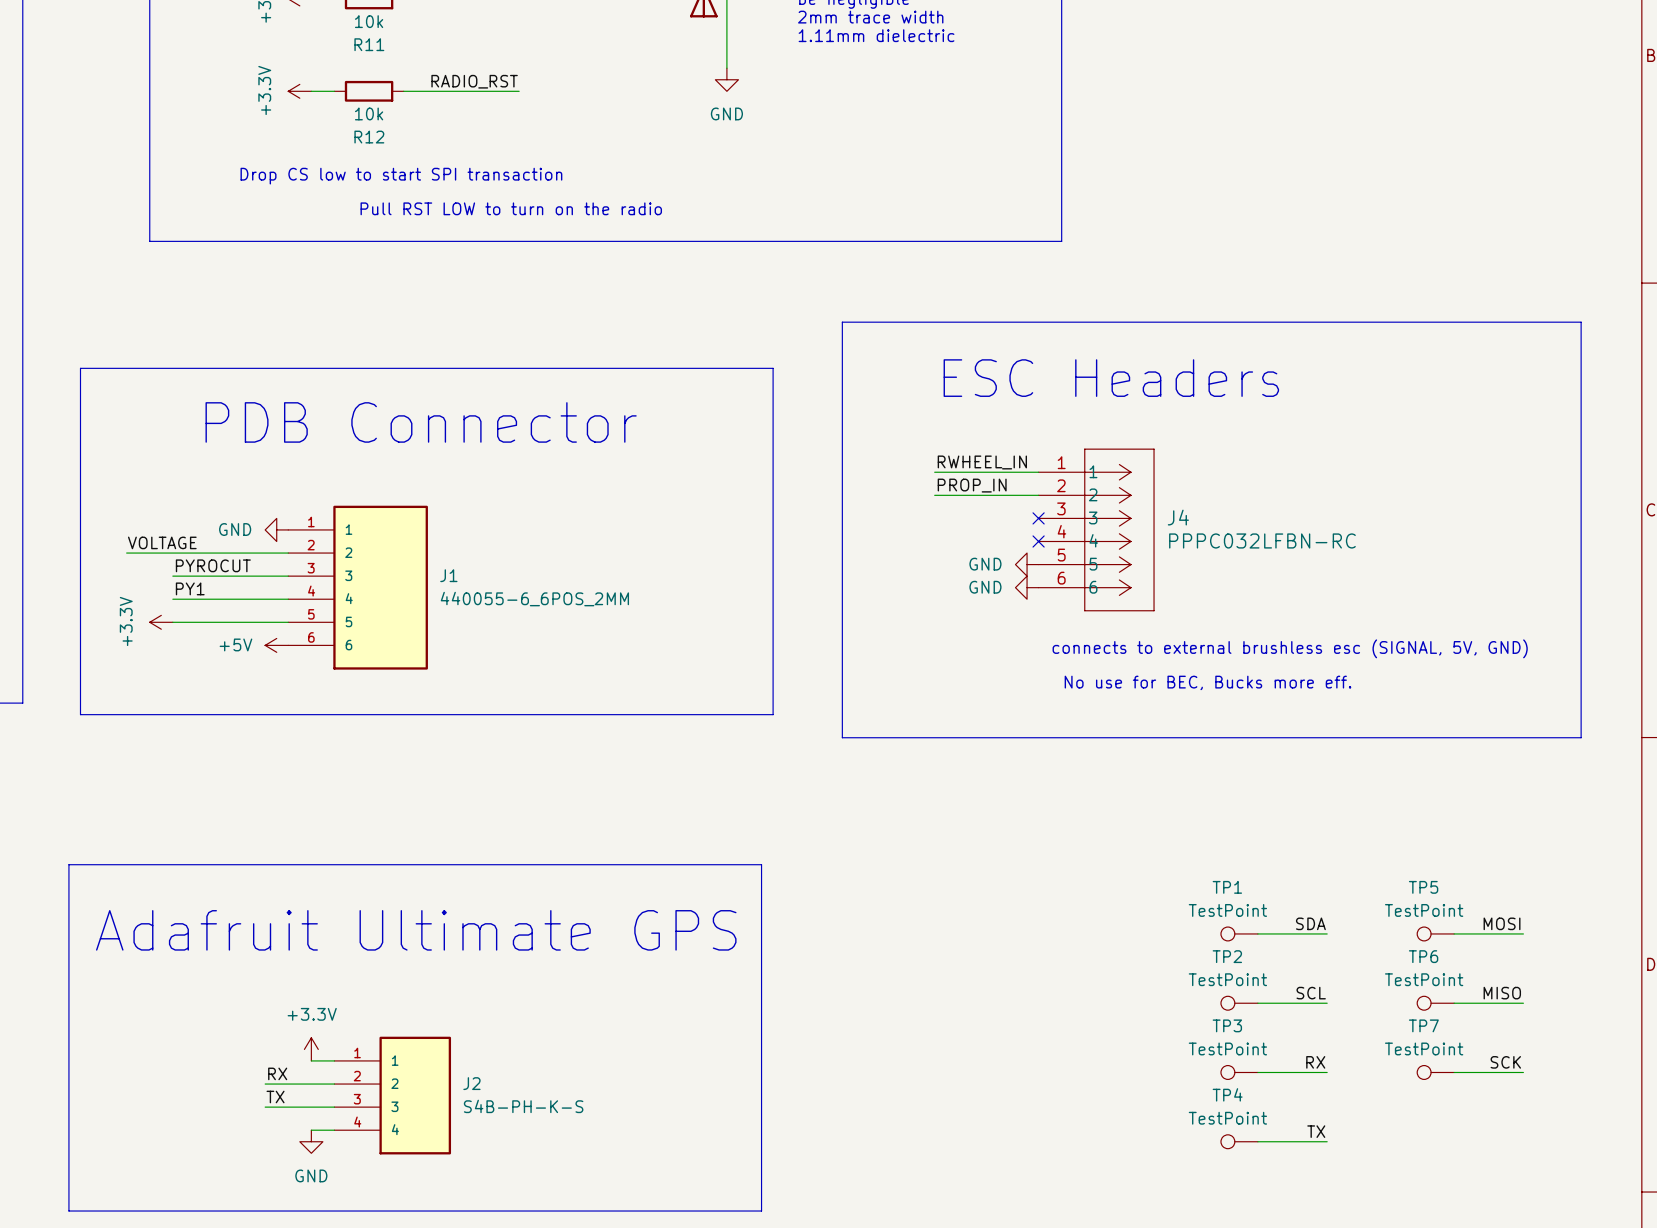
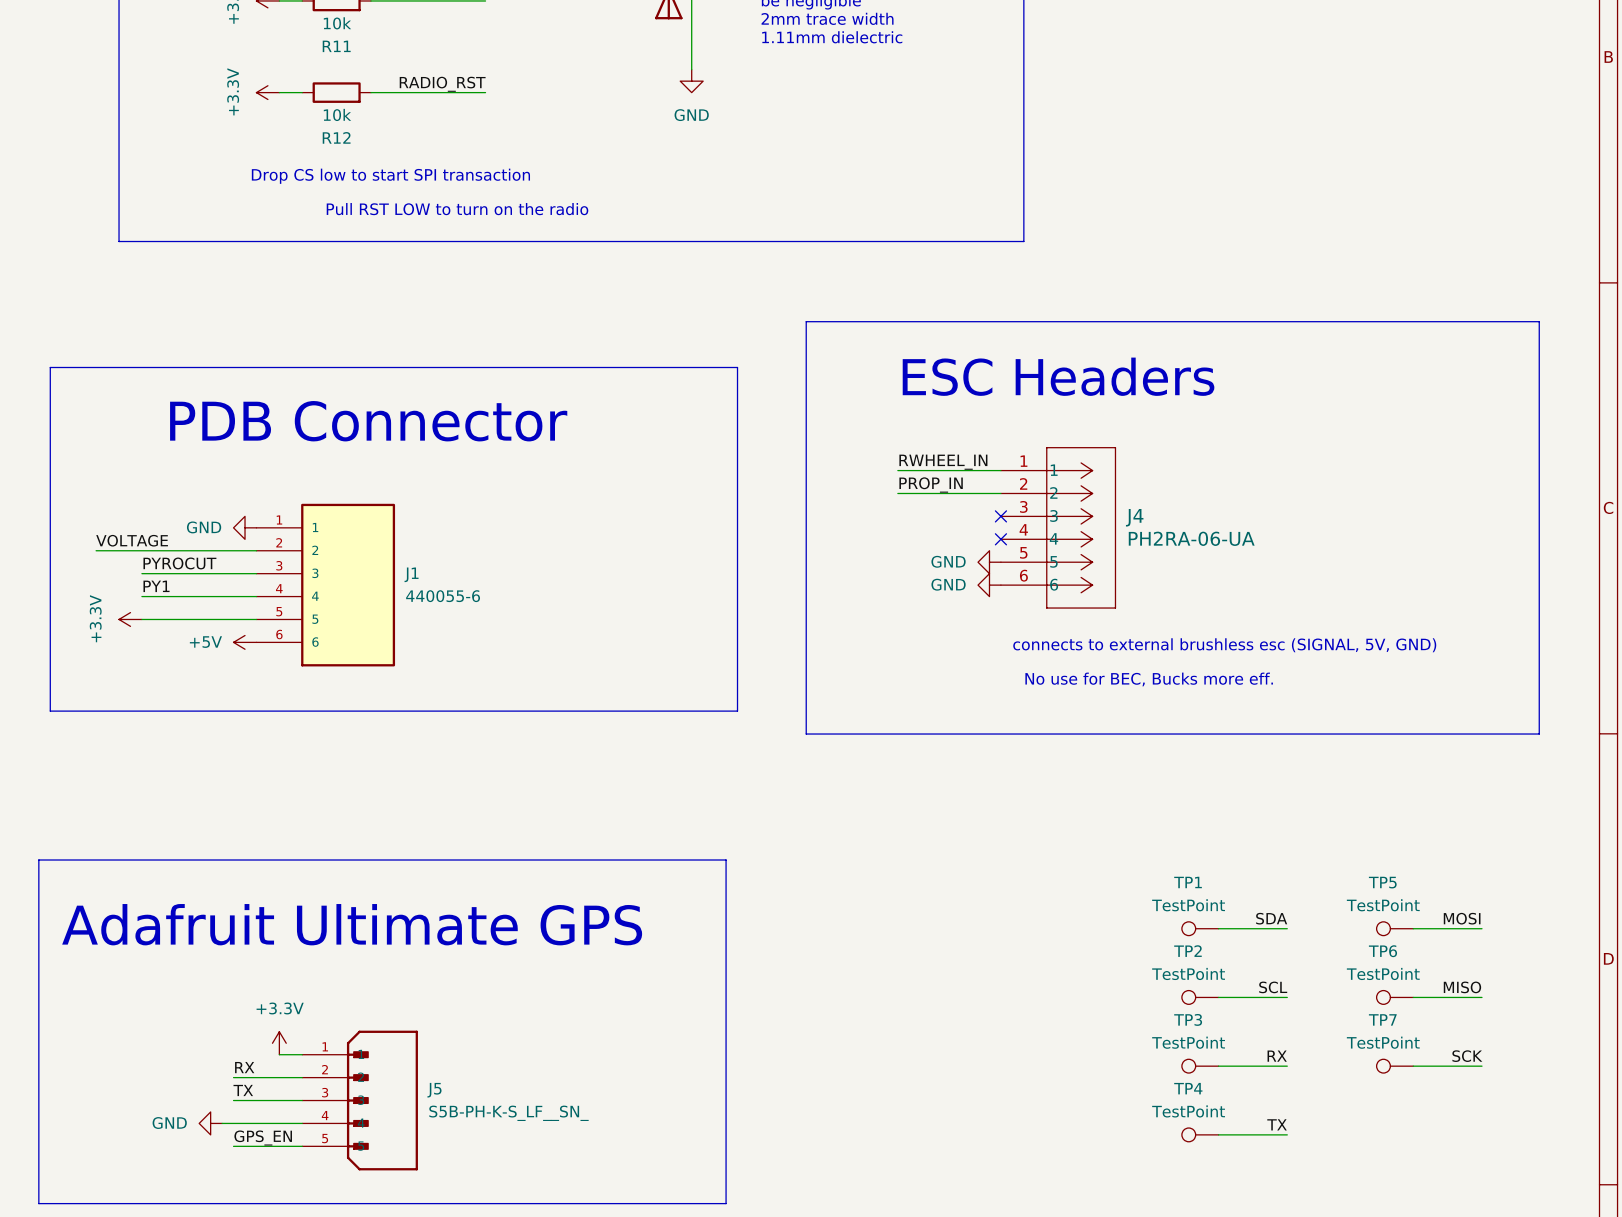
J4 value: PPPC032LFBN-RC (1262, 540) -> PH2RA-06-UA (1191, 538)
J1 value: 440055-6_6POS_2MM (534, 599) -> 440055-6 (443, 596)
J2: S4B-PH-K-S (392, 1095) -> none
J5: none -> S5B-PH-K-S_LF__SN_ (360, 1100)
wire: none -> (222, 1123) (279, 1123)
power symbol rotation: 0° (311, 1141) -> 90° clockwise (210, 1123)
power symbol position: GND (311, 1141) -> GND (210, 1123)
label: none -> GPS_EN (263, 1138)
wire: none -> (233, 1146) (302, 1146)

